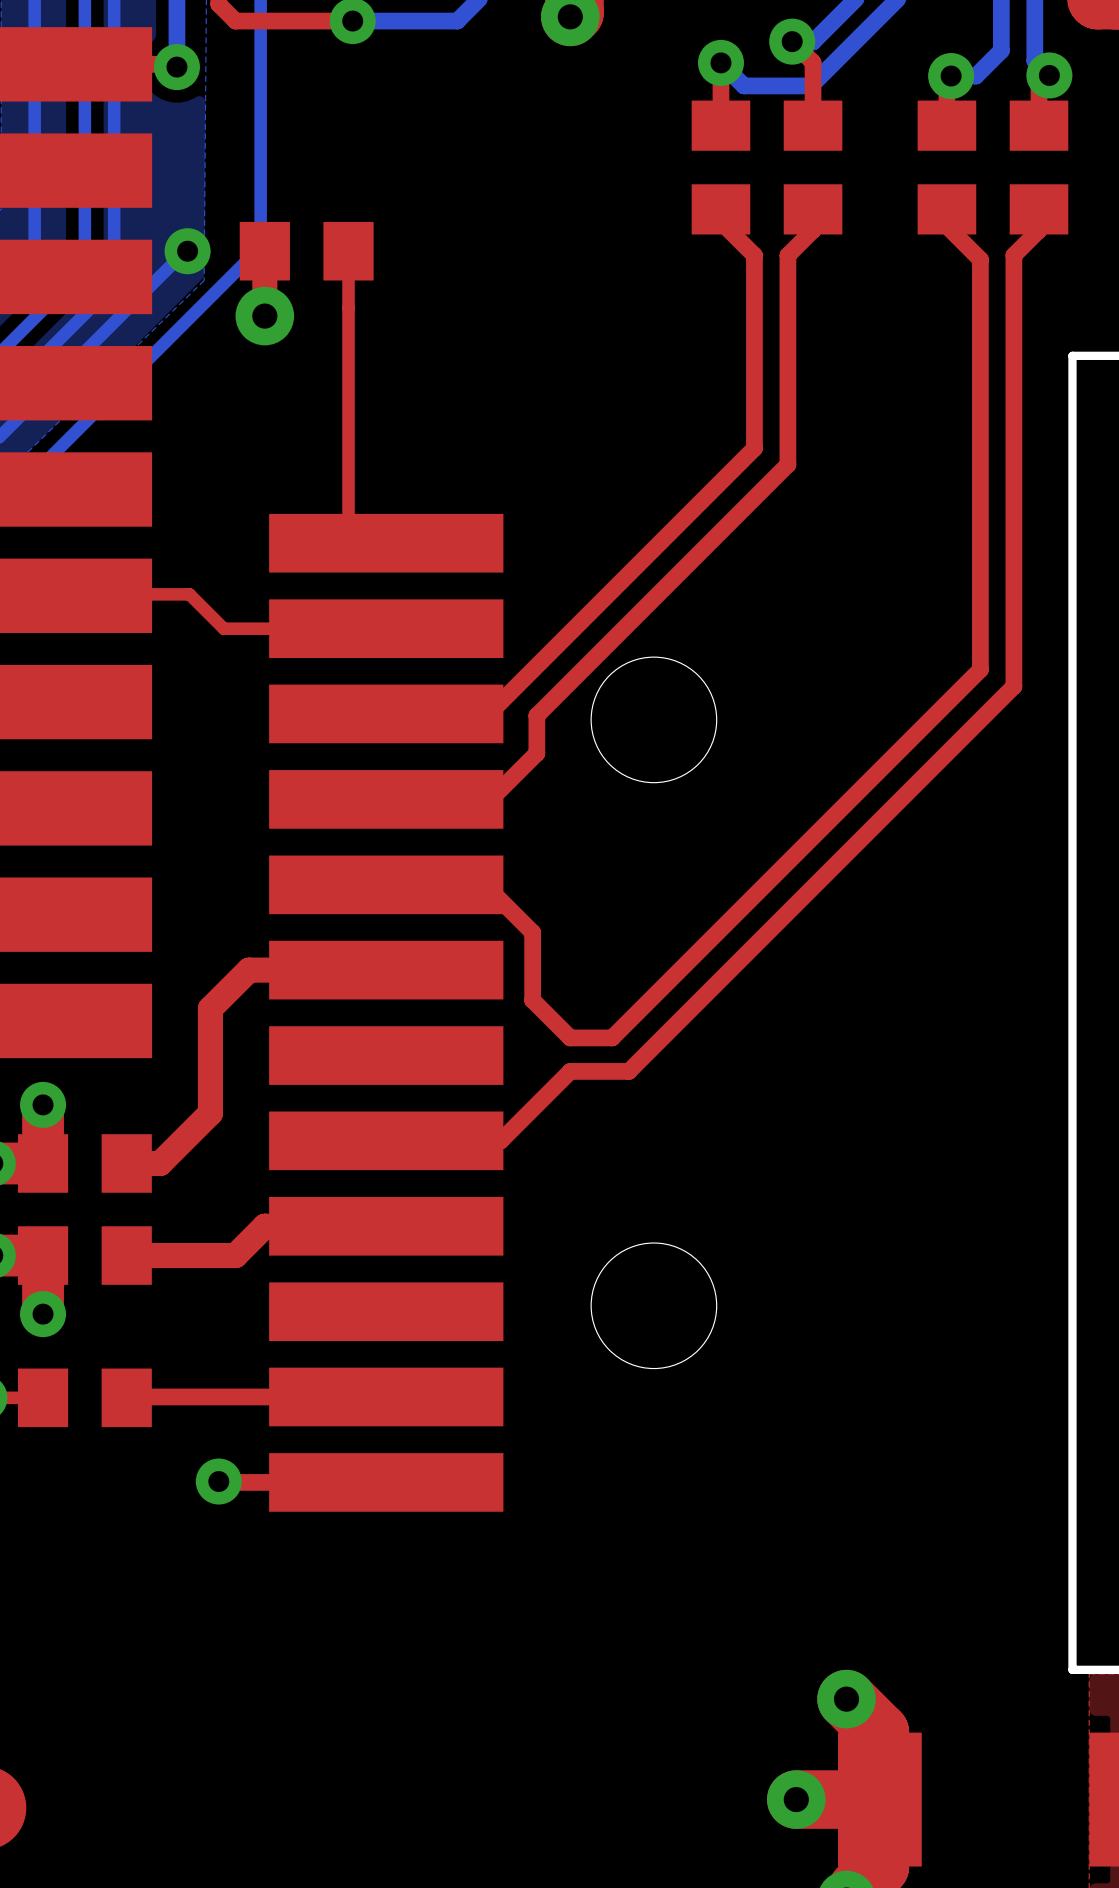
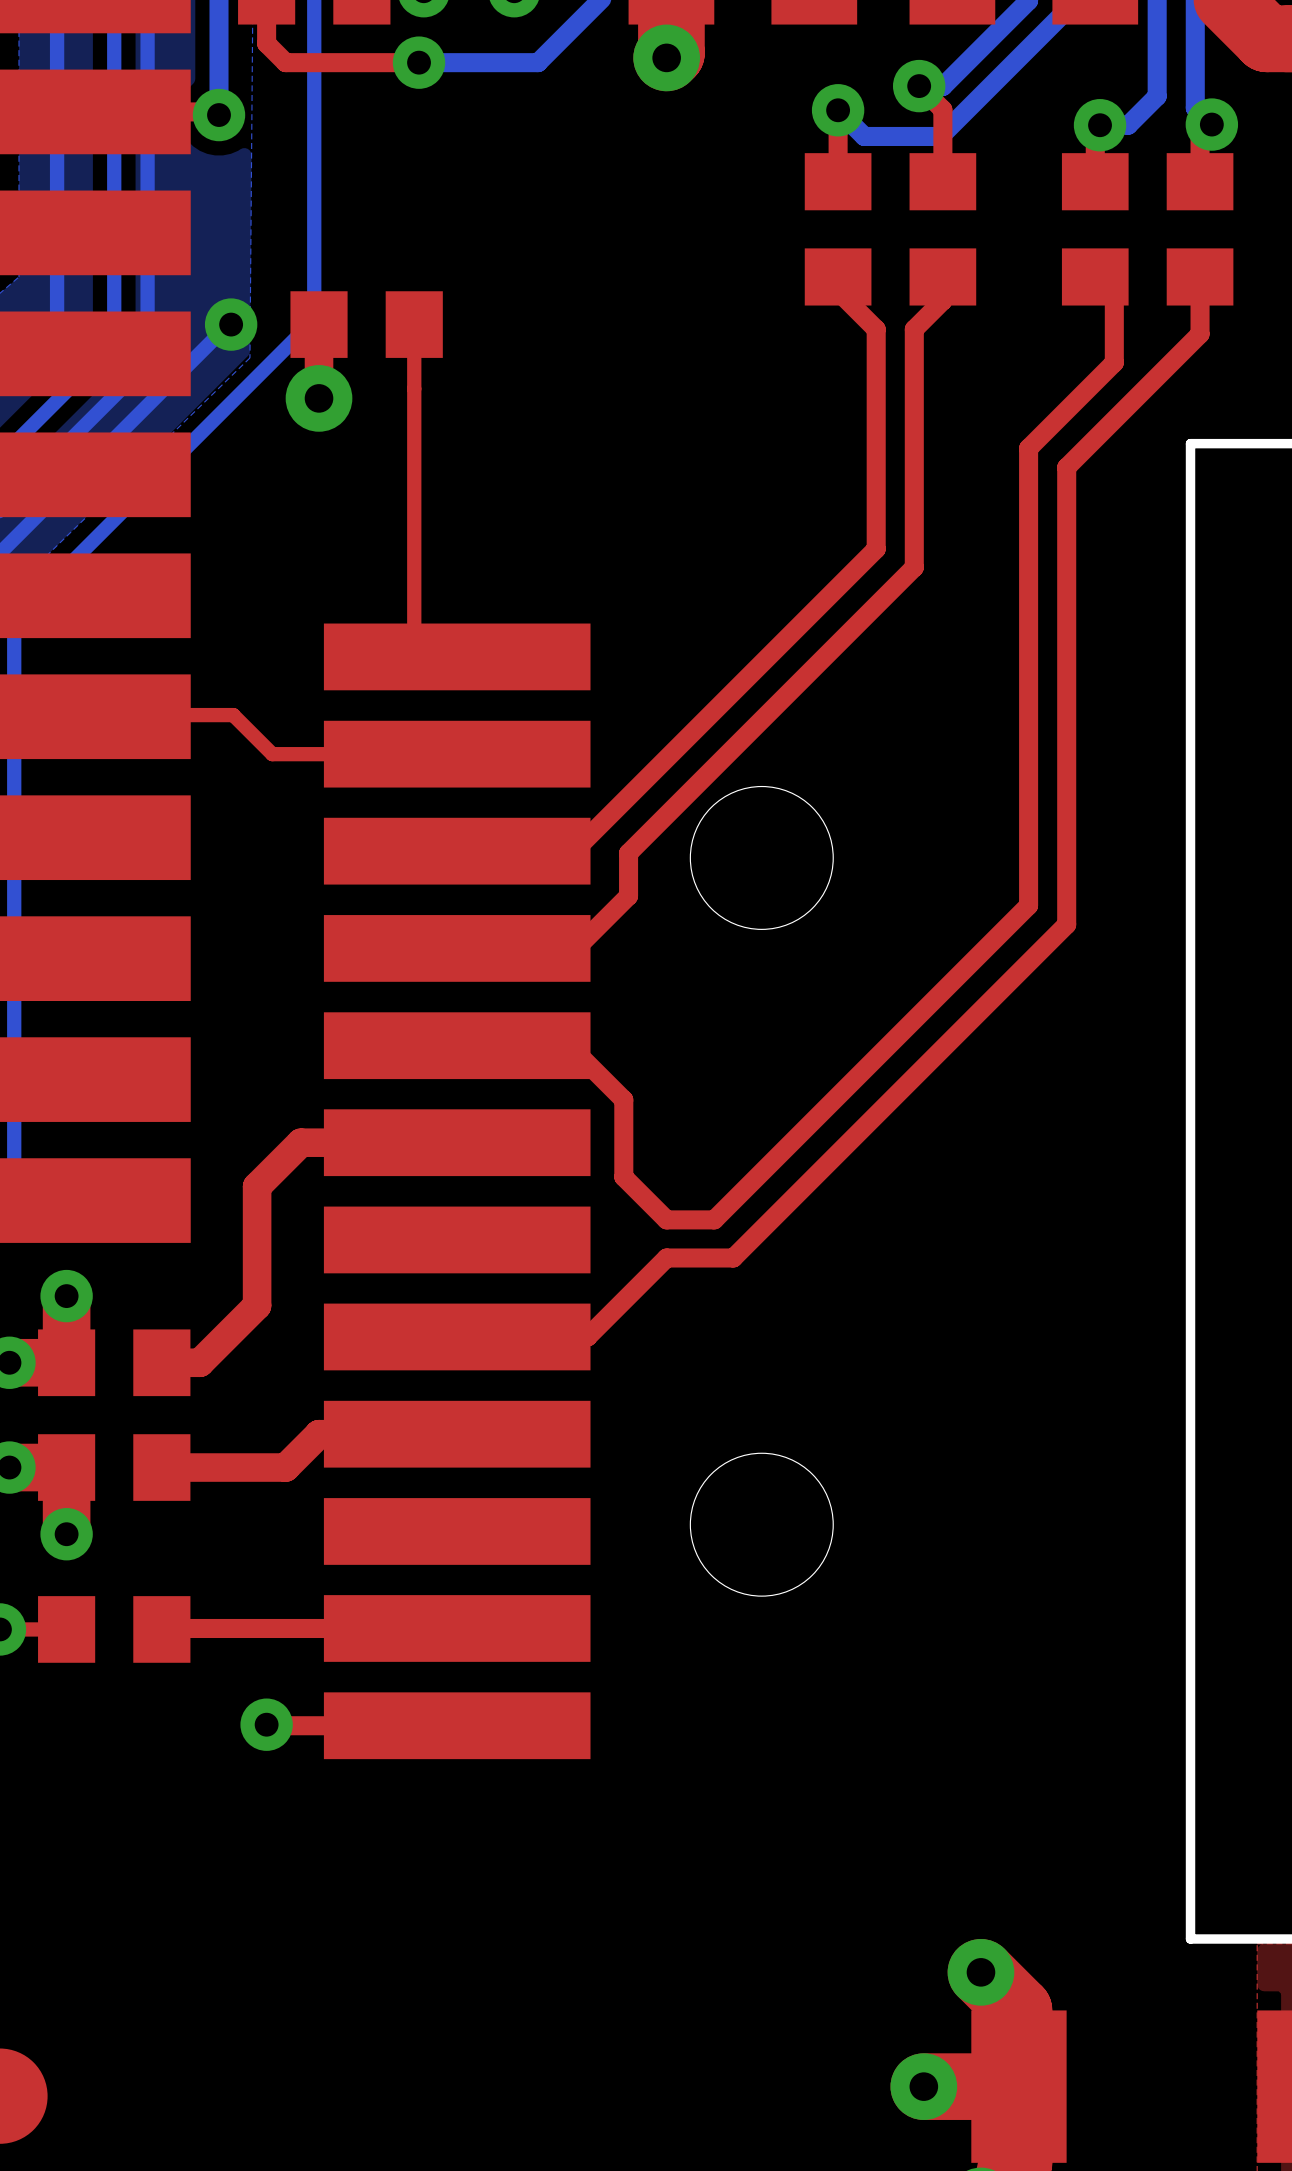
top track: (963, 209) (946, 226) (980, 259) (980, 669) (888, 761) -> (1114, 276) (1114, 362) (1028, 448) (1028, 905)
top track: (1039, 230) (1013, 255) (1013, 686) (921, 778) -> (1200, 300) (1200, 334) (1066, 467) (1066, 924)
board edge: (1072, 355) (1072, 1669) -> (1238, 443) (1190, 443) (1190, 1939) (1238, 1939)

